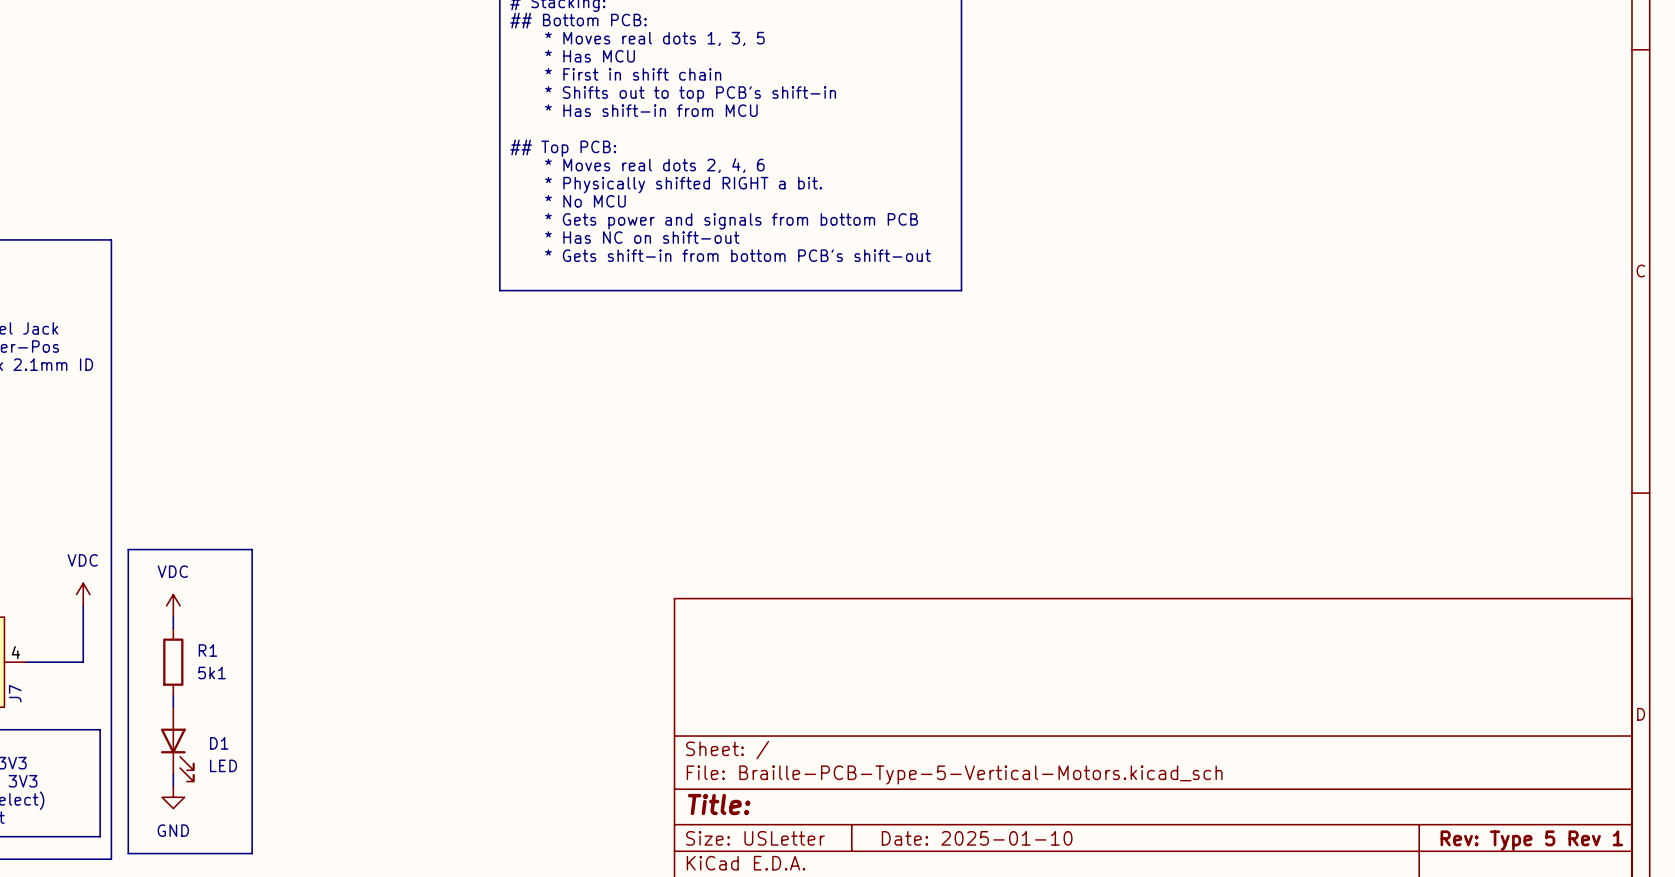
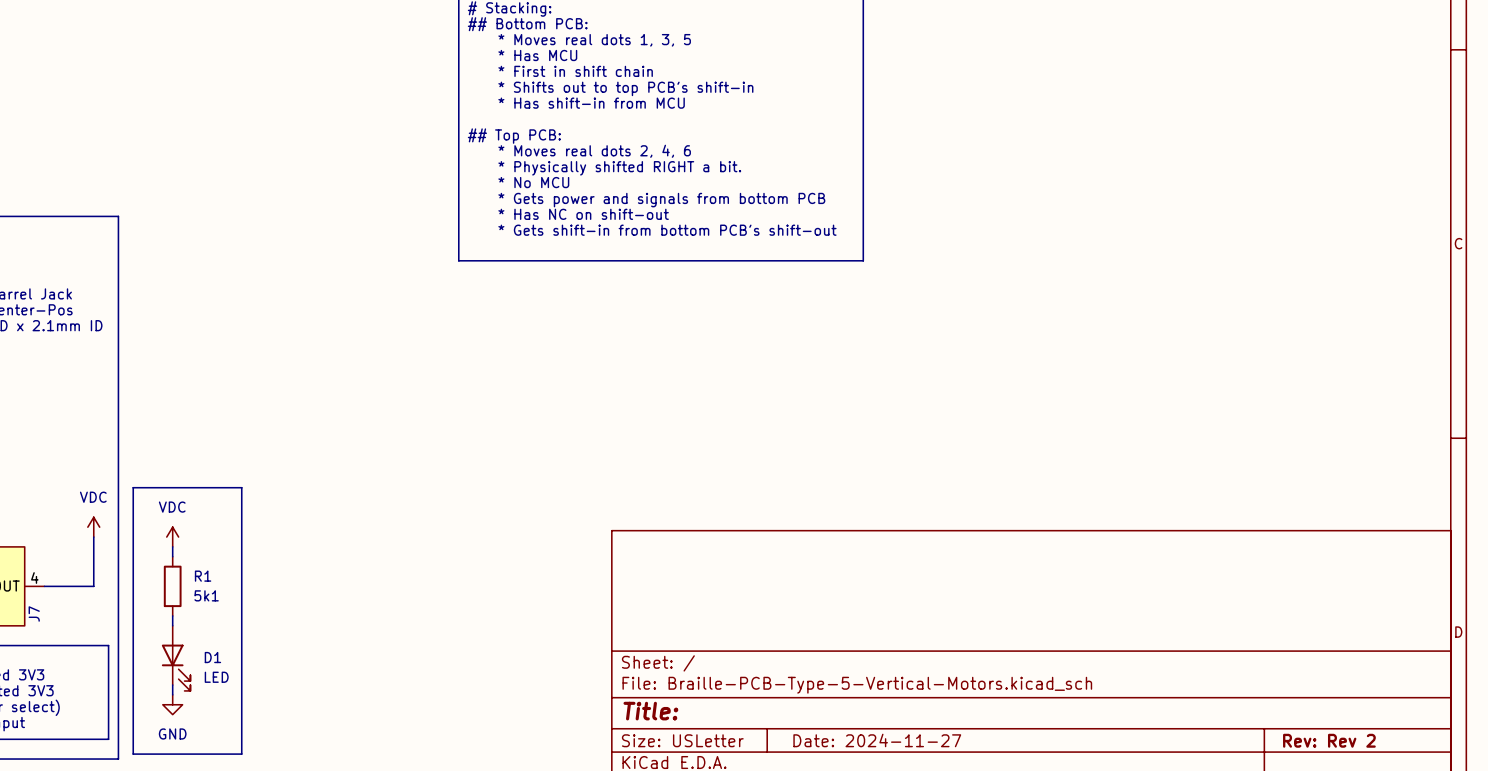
title block: Date: 2025-01-10 (977, 838) -> Date: 2024-11-27 (877, 740)
title block: Rev: Type 5 Rev 1 (1531, 840) -> Rev: Rev 2 (1329, 740)

